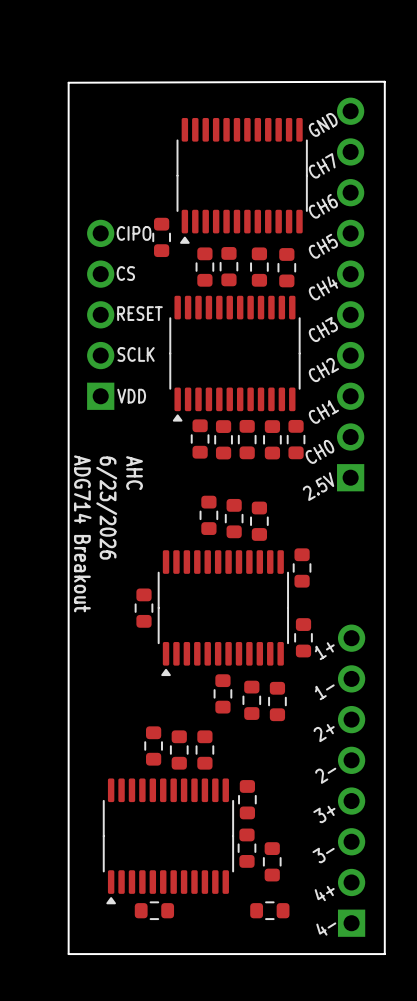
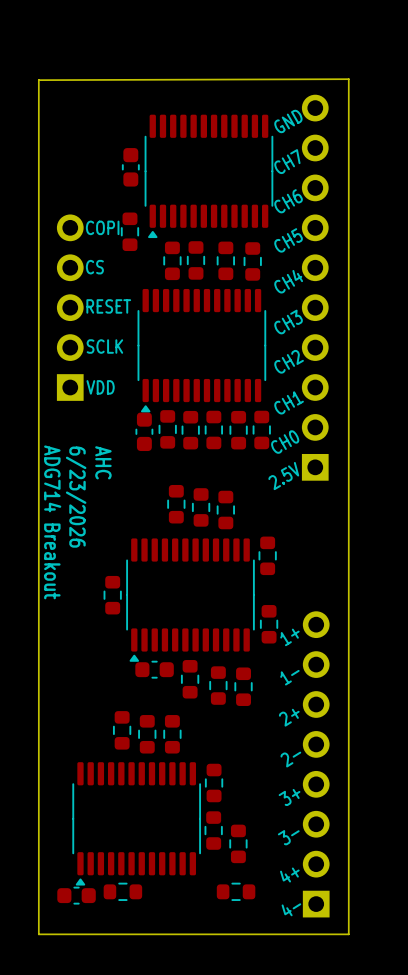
part: none -> (130, 167)
text: CIPO (134, 233) -> COPI (102, 227)
part: none -> (144, 431)
part: none -> (154, 669)
part: none -> (76, 895)

